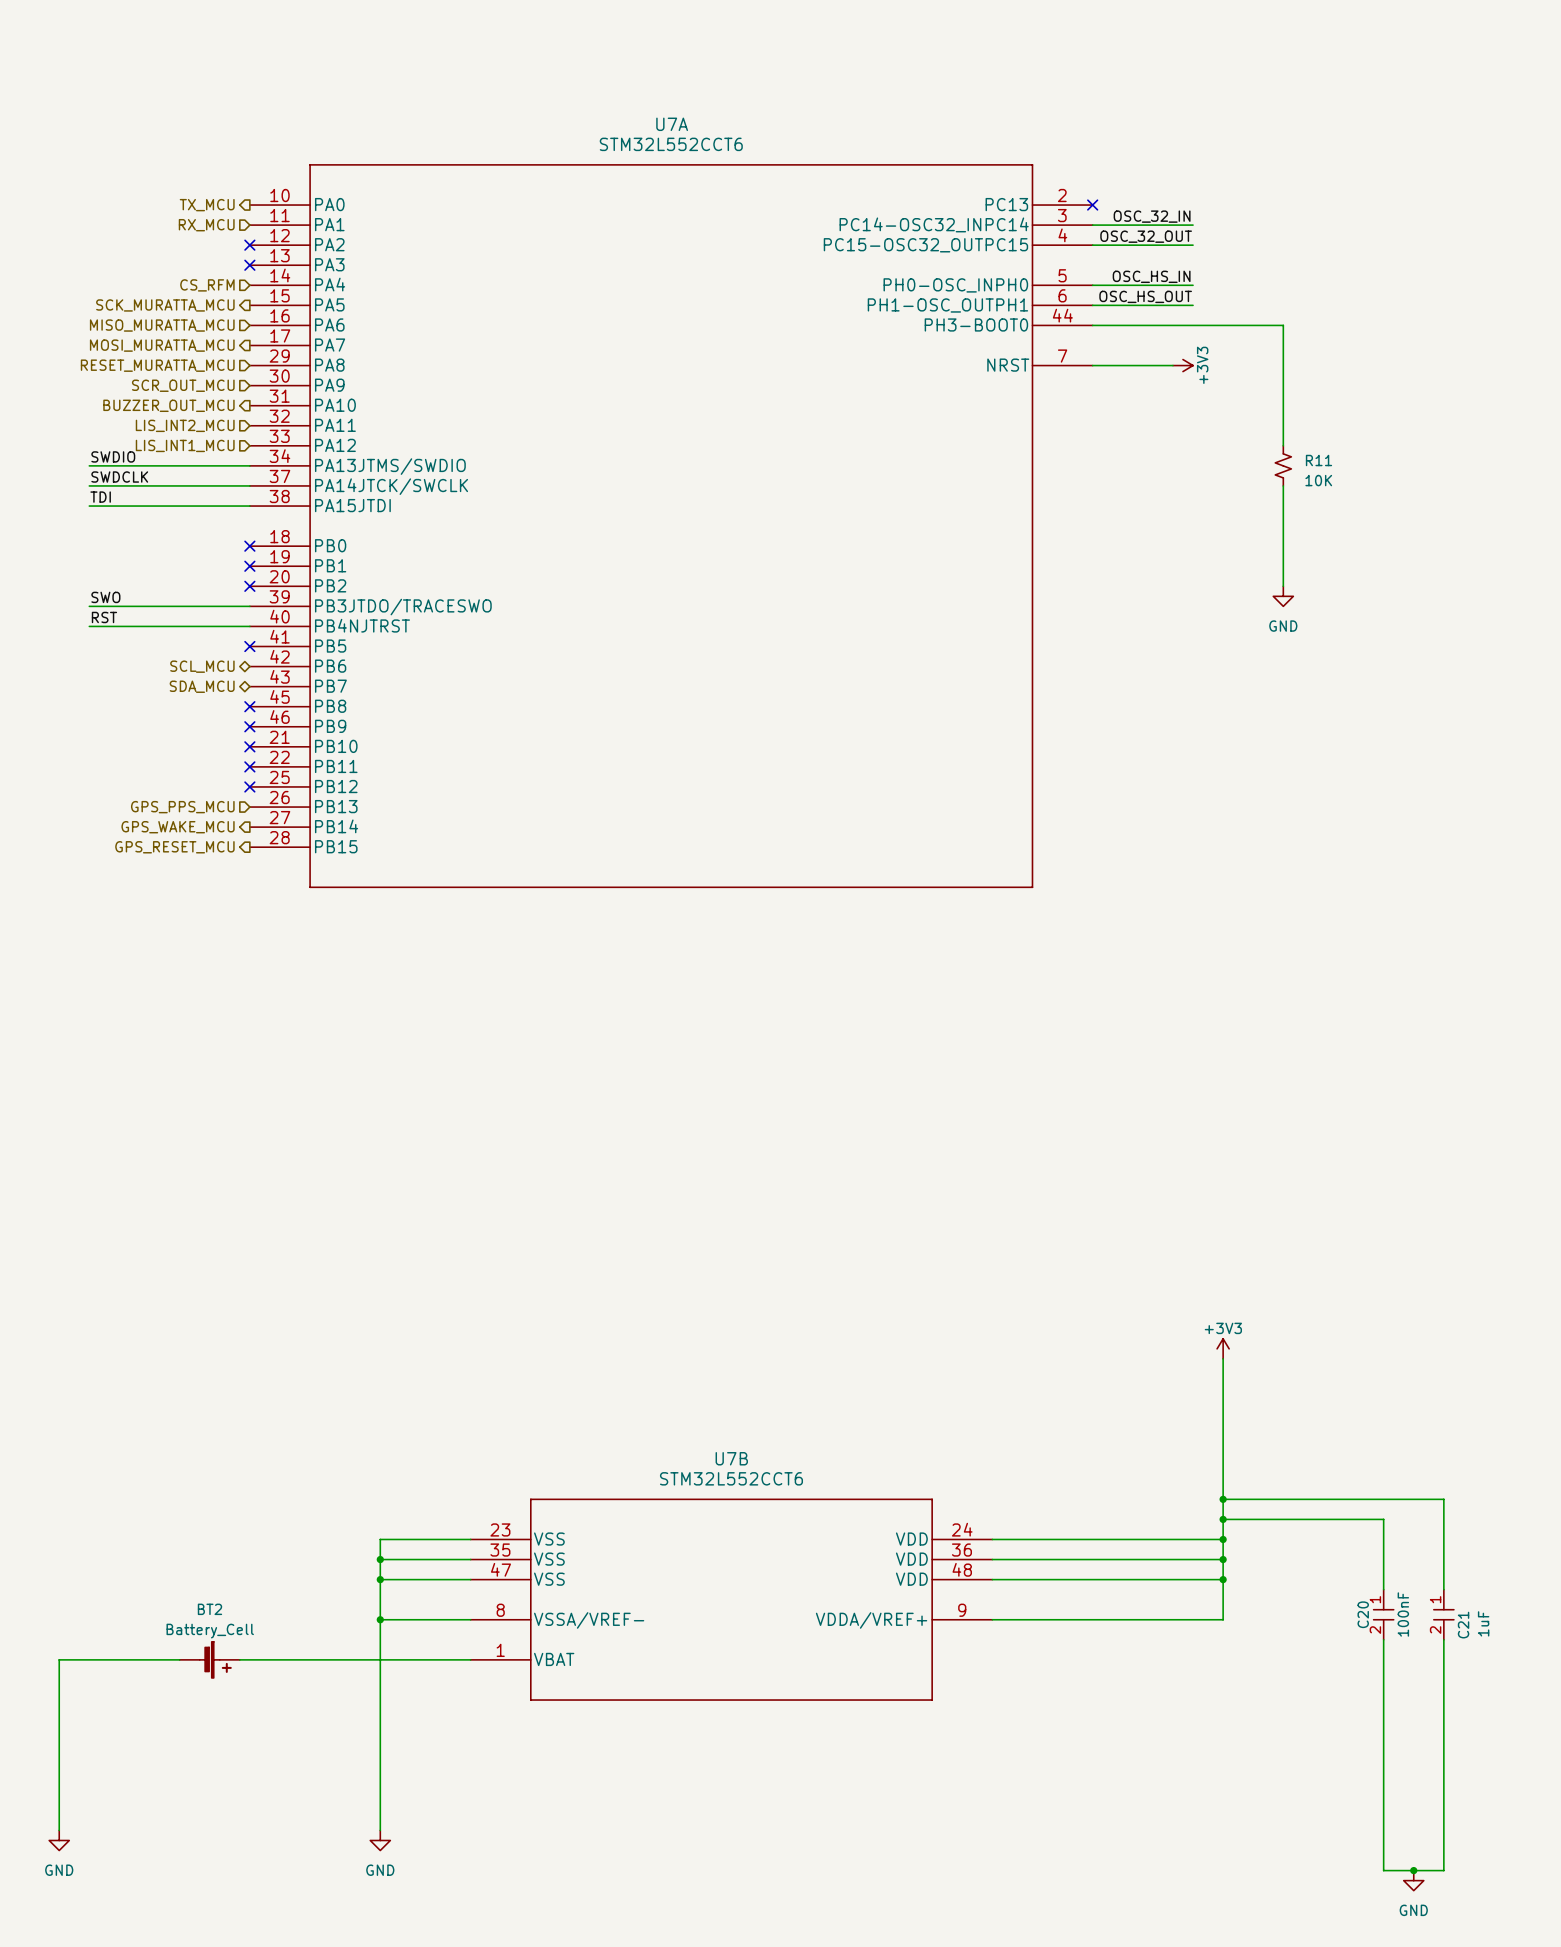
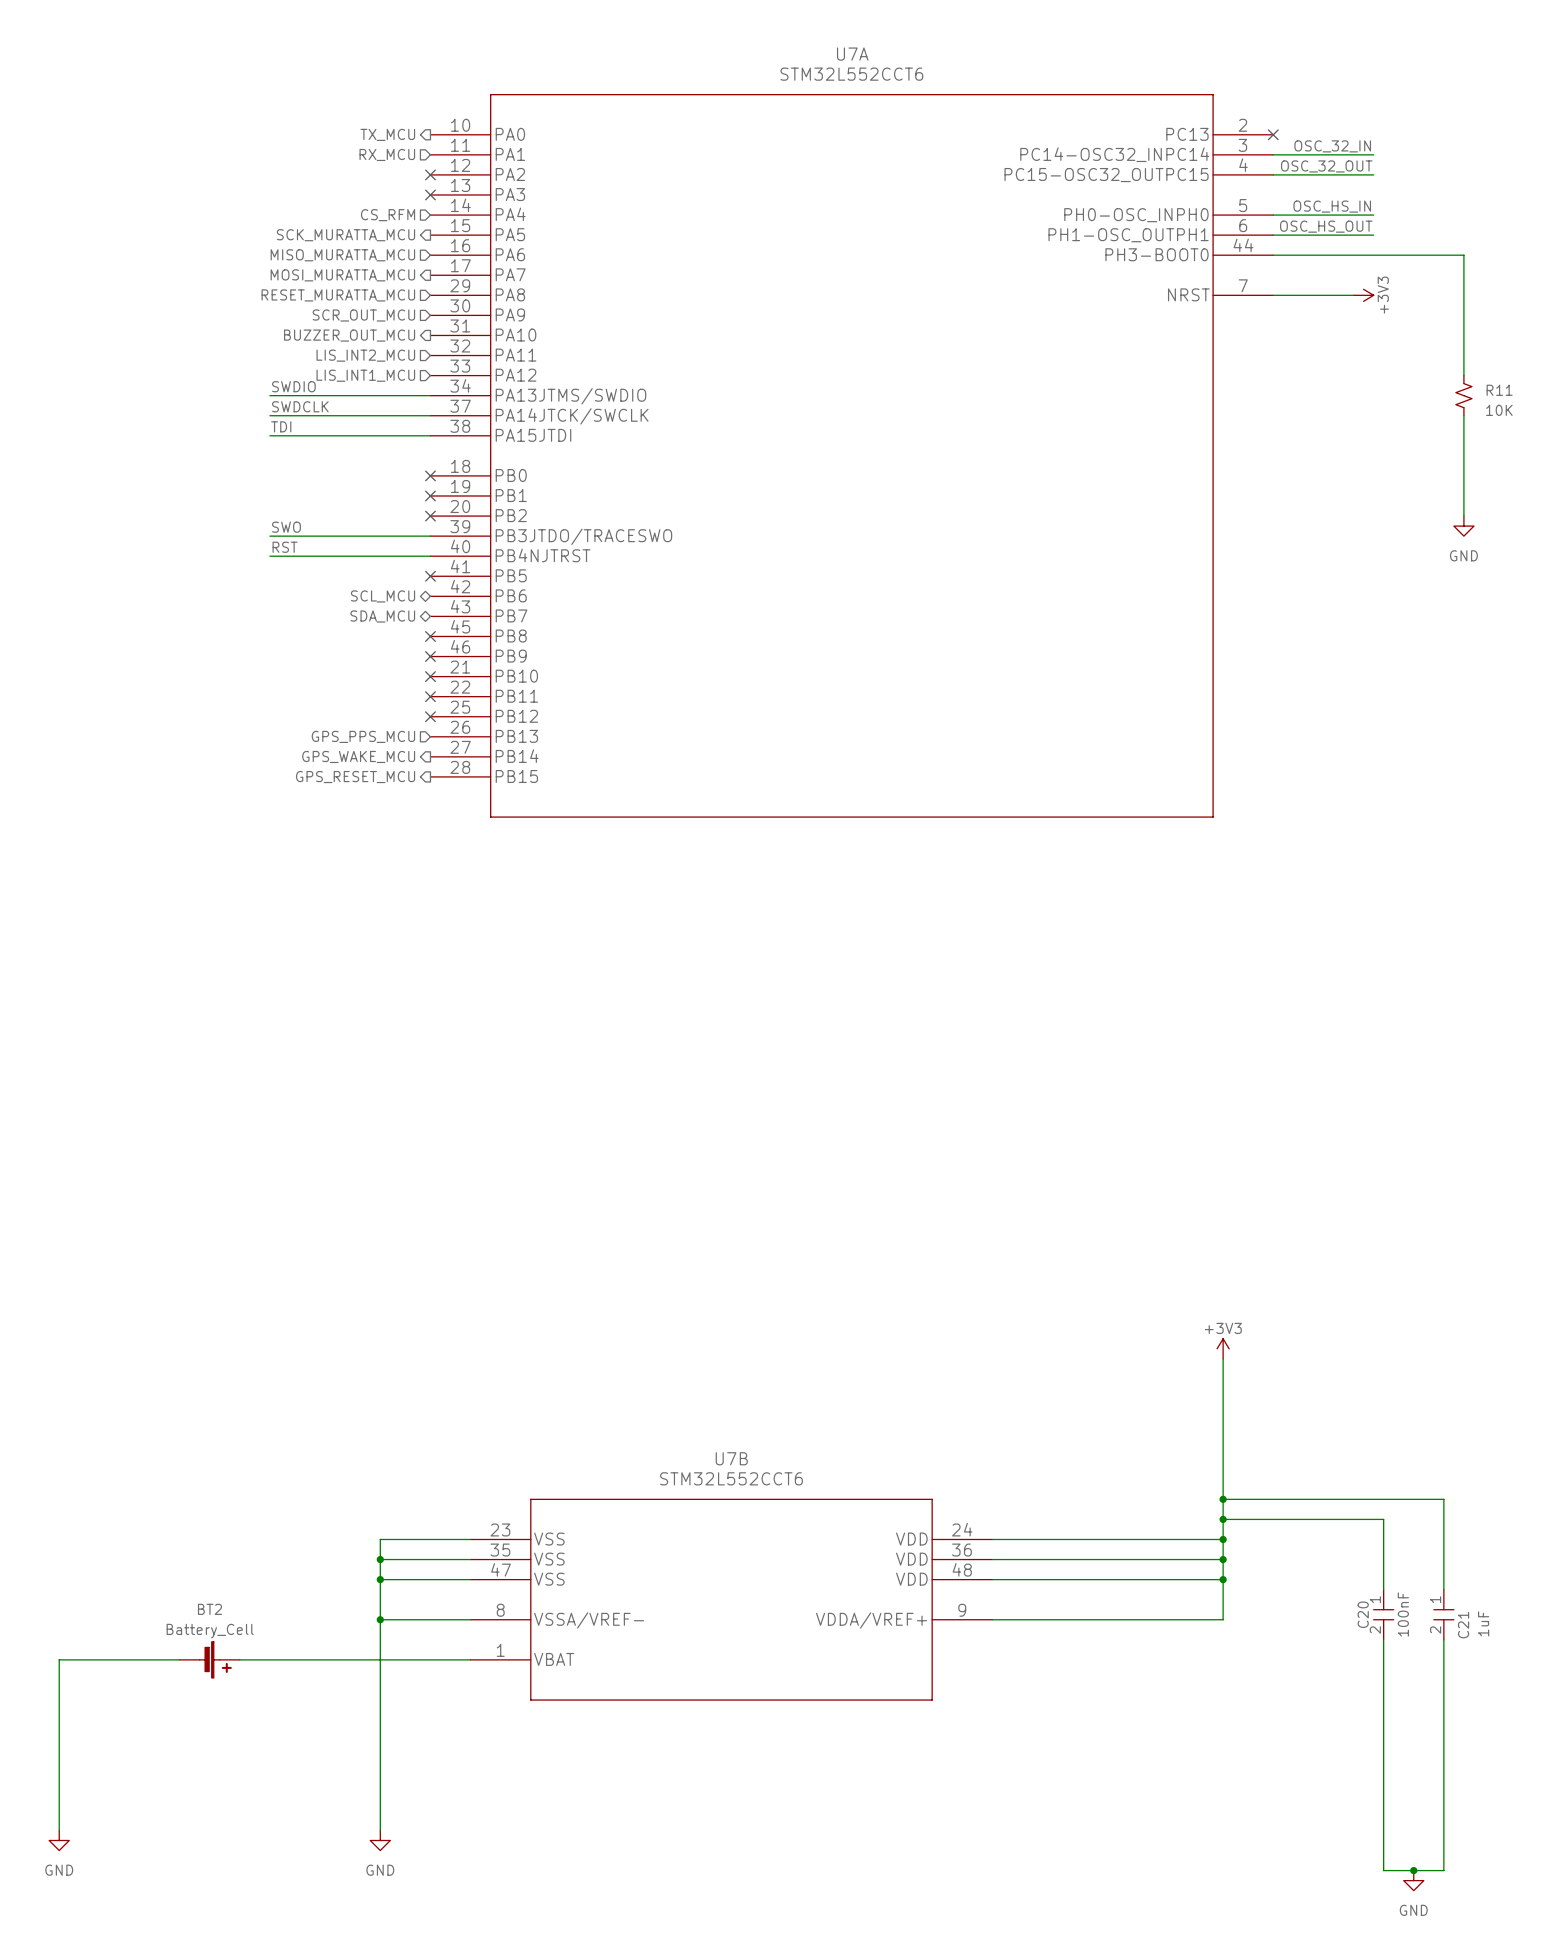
no-connect mark: none -> (1273, 134)
no-connect mark: none -> (430, 174)
no-connect mark: none -> (430, 194)
hierarchical label position: TX_MCU (207, 205) -> TX_MCU (387, 134)
no-connect mark: (1092, 205) -> none
label position: OSC_32_IN (1152, 216) -> OSC_32_IN (1332, 146)
hierarchical label position: RX_MCU (206, 225) -> RX_MCU (387, 154)
wire: (1092, 225) (1193, 225) -> (1273, 154) (1373, 154)
label position: OSC_32_OUT (1146, 236) -> OSC_32_OUT (1326, 166)
no-connect mark: (249, 245) -> none
wire: (1092, 245) (1193, 245) -> (1273, 174) (1373, 174)
no-connect mark: (249, 265) -> none
label position: OSC_HS_IN (1151, 276) -> OSC_HS_IN (1332, 206)
hierarchical label position: CS_RFM (207, 285) -> CS_RFM (388, 215)
wire: (1092, 285) (1193, 285) -> (1273, 215) (1373, 215)
label position: OSC_HS_OUT (1145, 296) -> OSC_HS_OUT (1326, 226)
hierarchical label position: SCK_MURATTA_MCU (165, 305) -> SCK_MURATTA_MCU (345, 235)
wire: (1092, 305) (1193, 305) -> (1273, 235) (1373, 235)
hierarchical label position: MISO_MURATTA_MCU (162, 325) -> MISO_MURATTA_MCU (342, 255)
wire: (1092, 325) (1283, 325) (1283, 445) -> (1273, 255) (1463, 255) (1463, 375)
hierarchical label position: MOSI_MURATTA_MCU (162, 345) -> MOSI_MURATTA_MCU (342, 275)
hierarchical label position: RESET_MURATTA_MCU (157, 365) -> RESET_MURATTA_MCU (338, 295)
wire: (1092, 365) (1172, 365) -> (1273, 295) (1353, 295)
power symbol position: +3V3 (1182, 365) -> +3V3 (1363, 295)
hierarchical label position: SCR_OUT_MCU (183, 385) -> SCR_OUT_MCU (363, 315)
hierarchical label position: BUZZER_OUT_MCU (168, 405) -> BUZZER_OUT_MCU (349, 335)
hierarchical label position: LIS_INT2_MCU (185, 425) -> LIS_INT2_MCU (365, 355)
hierarchical label position: LIS_INT1_MCU (185, 445) -> LIS_INT1_MCU (365, 375)
label position: SWDIO (113, 456) -> SWDIO (293, 386)
wire: (89, 465) (249, 465) -> (269, 395) (430, 395)
R11 position: (1283, 465) -> (1463, 395)
no-connect mark: none -> (430, 475)
label position: SWDCLK (119, 477) -> SWDCLK (300, 406)
wire: (89, 485) (249, 485) -> (269, 415) (430, 415)
wire: (1283, 485) (1283, 586) -> (1463, 415) (1463, 516)
no-connect mark: none -> (430, 495)
label position: TDI (100, 497) -> TDI (281, 426)
wire: (89, 506) (249, 506) -> (269, 435) (430, 435)
no-connect mark: none -> (430, 516)
U7A position: (671, 526) -> (851, 455)
no-connect mark: (249, 546) -> none
no-connect mark: (249, 566) -> none
no-connect mark: none -> (430, 576)
no-connect mark: (249, 586) -> none
power symbol position: GND (1283, 596) -> GND (1463, 526)
label position: SWO (105, 597) -> SWO (286, 527)
wire: (89, 606) (249, 606) -> (269, 536) (430, 536)
label position: RST (104, 617) -> RST (285, 547)
wire: (89, 626) (249, 626) -> (269, 556) (430, 556)
no-connect mark: none -> (430, 636)
no-connect mark: (249, 646) -> none
no-connect mark: none -> (430, 656)
hierarchical label position: SCL_MCU (202, 666) -> SCL_MCU (383, 596)
no-connect mark: none -> (430, 676)
hierarchical label position: SDA_MCU (202, 686) -> SDA_MCU (382, 616)
no-connect mark: none -> (430, 696)
no-connect mark: (249, 706) -> none
no-connect mark: none -> (430, 716)
no-connect mark: (249, 726) -> none
no-connect mark: (249, 746) -> none
no-connect mark: (249, 766) -> none
no-connect mark: (249, 786) -> none
hierarchical label position: GPS_PPS_MCU (182, 807) -> GPS_PPS_MCU (363, 736)
hierarchical label position: GPS_WAKE_MCU (178, 827) -> GPS_WAKE_MCU (358, 756)
hierarchical label position: GPS_RESET_MCU (174, 847) -> GPS_RESET_MCU (355, 777)

